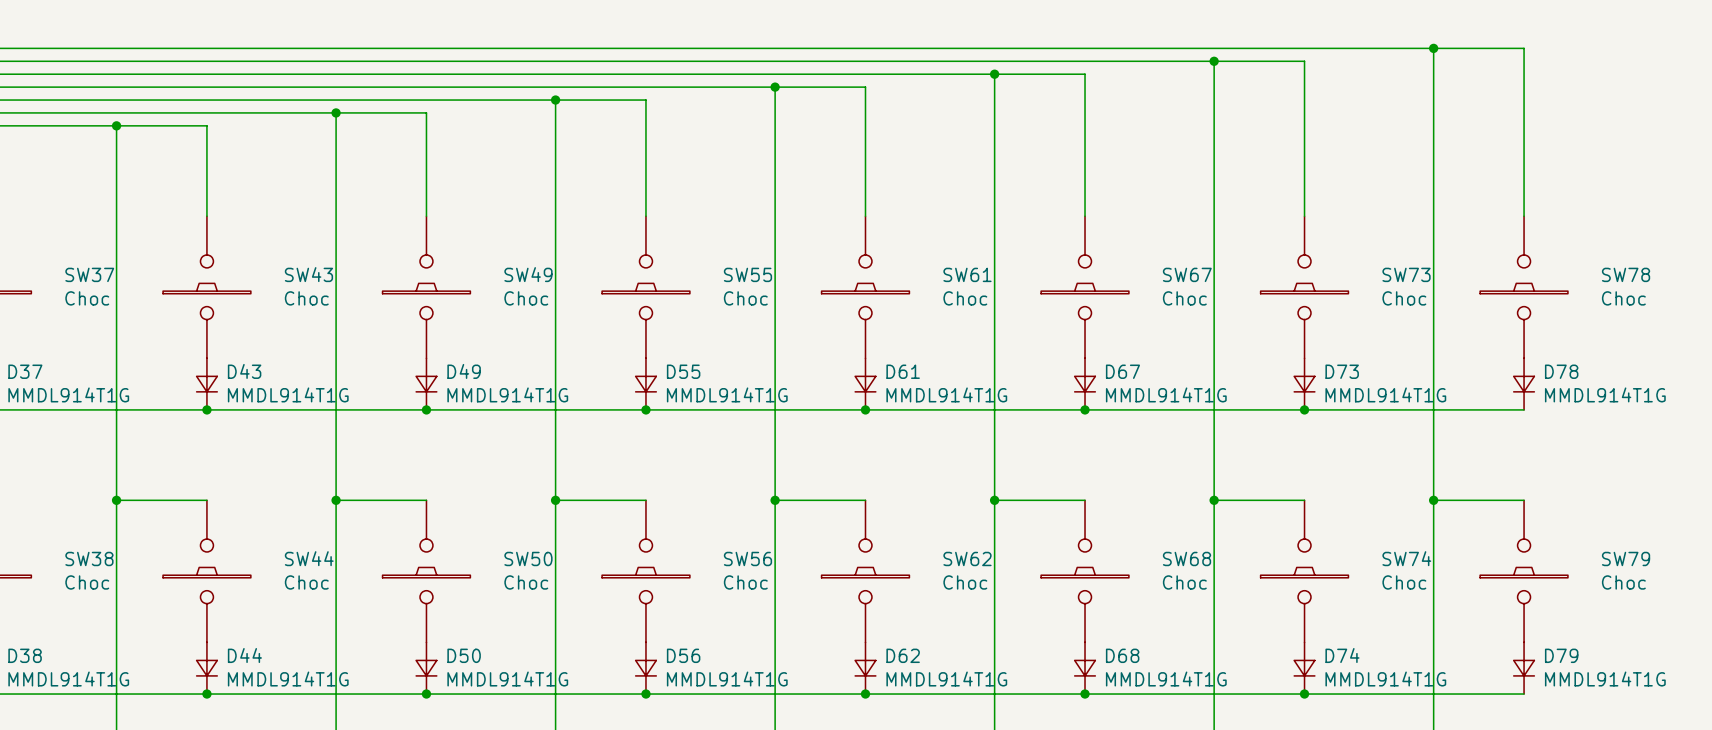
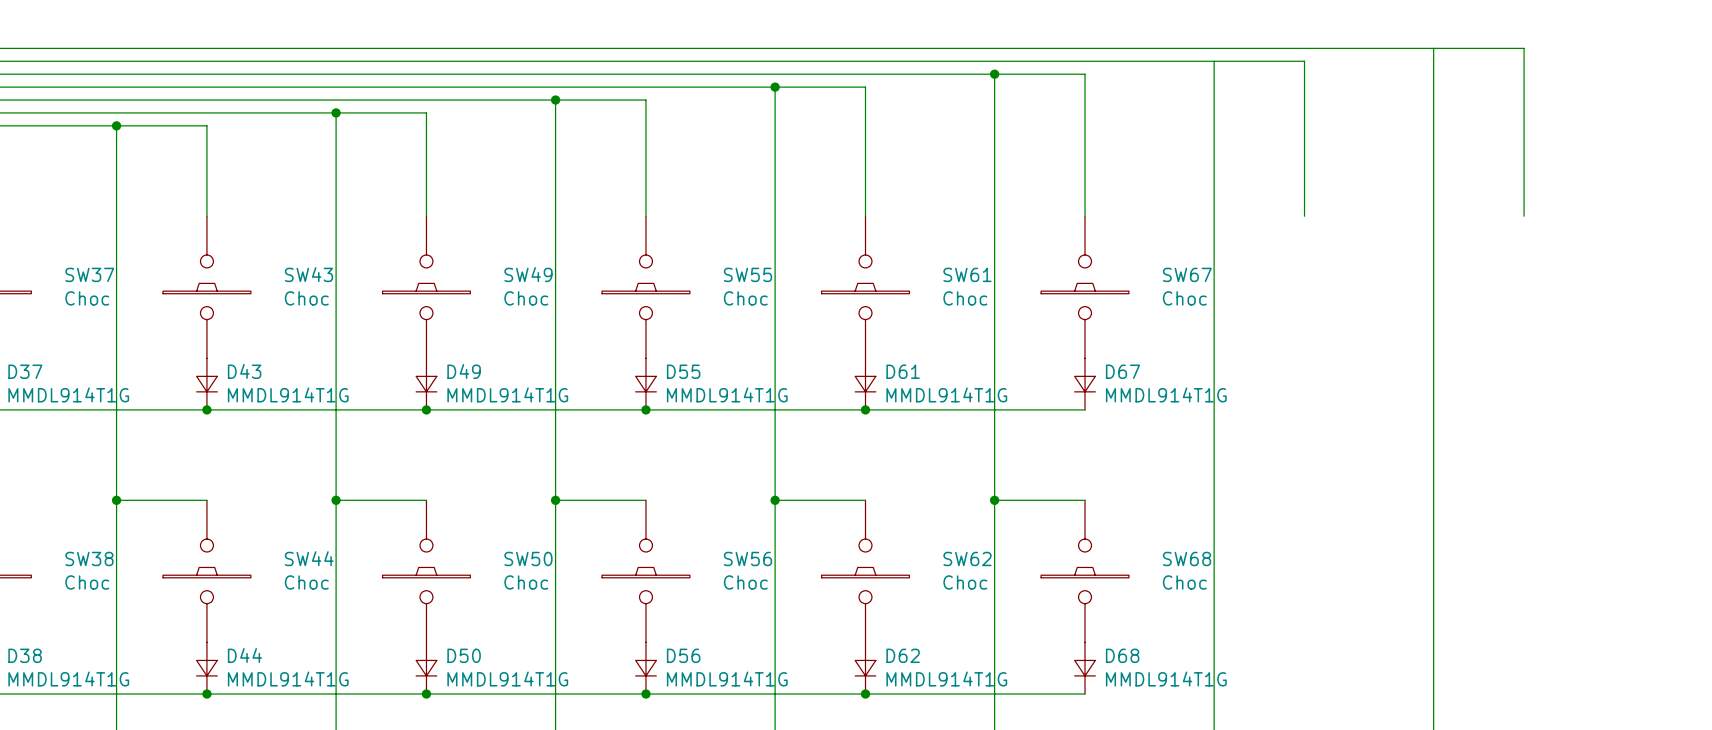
junction: (1433, 48) -> none
junction: (1214, 61) -> none
SW73: Choc (1304, 287) -> none
SW78: Choc (1524, 287) -> none
D73: MMDL914T1G (1304, 384) -> none
D78: MMDL914T1G (1524, 384) -> none
wire: (1085, 409) (1524, 409) -> none
junction: (1085, 409) -> none
junction: (1304, 409) -> none
wire: (1214, 500) (1304, 500) -> none
junction: (1214, 500) -> none
wire: (1433, 500) (1524, 500) -> none
junction: (1433, 500) -> none
SW74: Choc (1304, 571) -> none
SW79: Choc (1524, 571) -> none
D74: MMDL914T1G (1304, 668) -> none
D79: MMDL914T1G (1524, 668) -> none
wire: (1085, 694) (1524, 694) -> none
junction: (1085, 694) -> none
junction: (1304, 694) -> none

